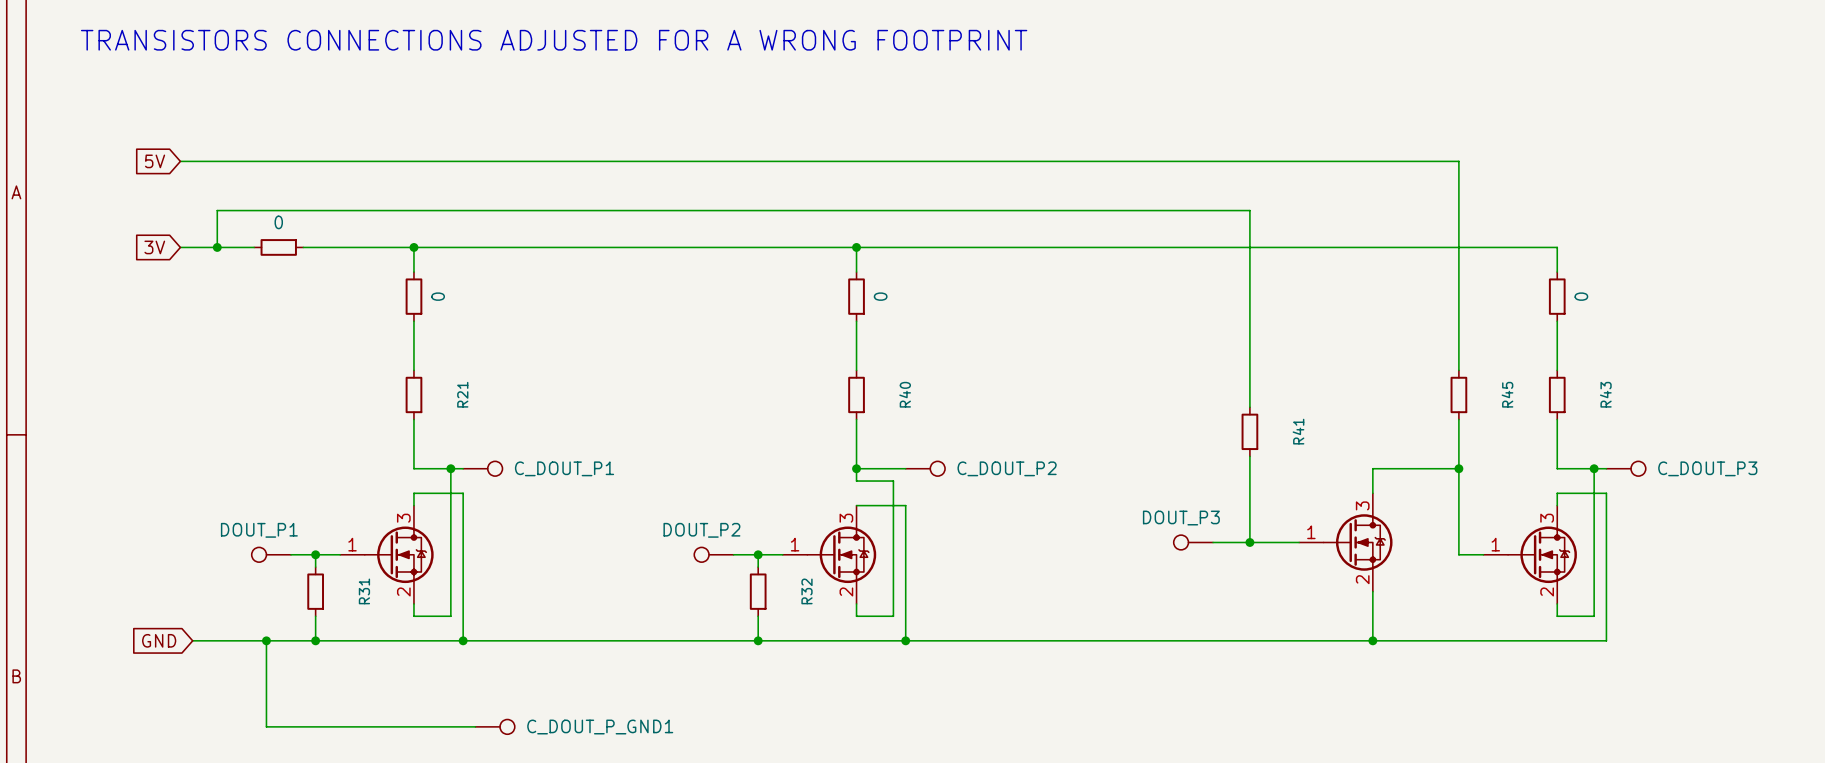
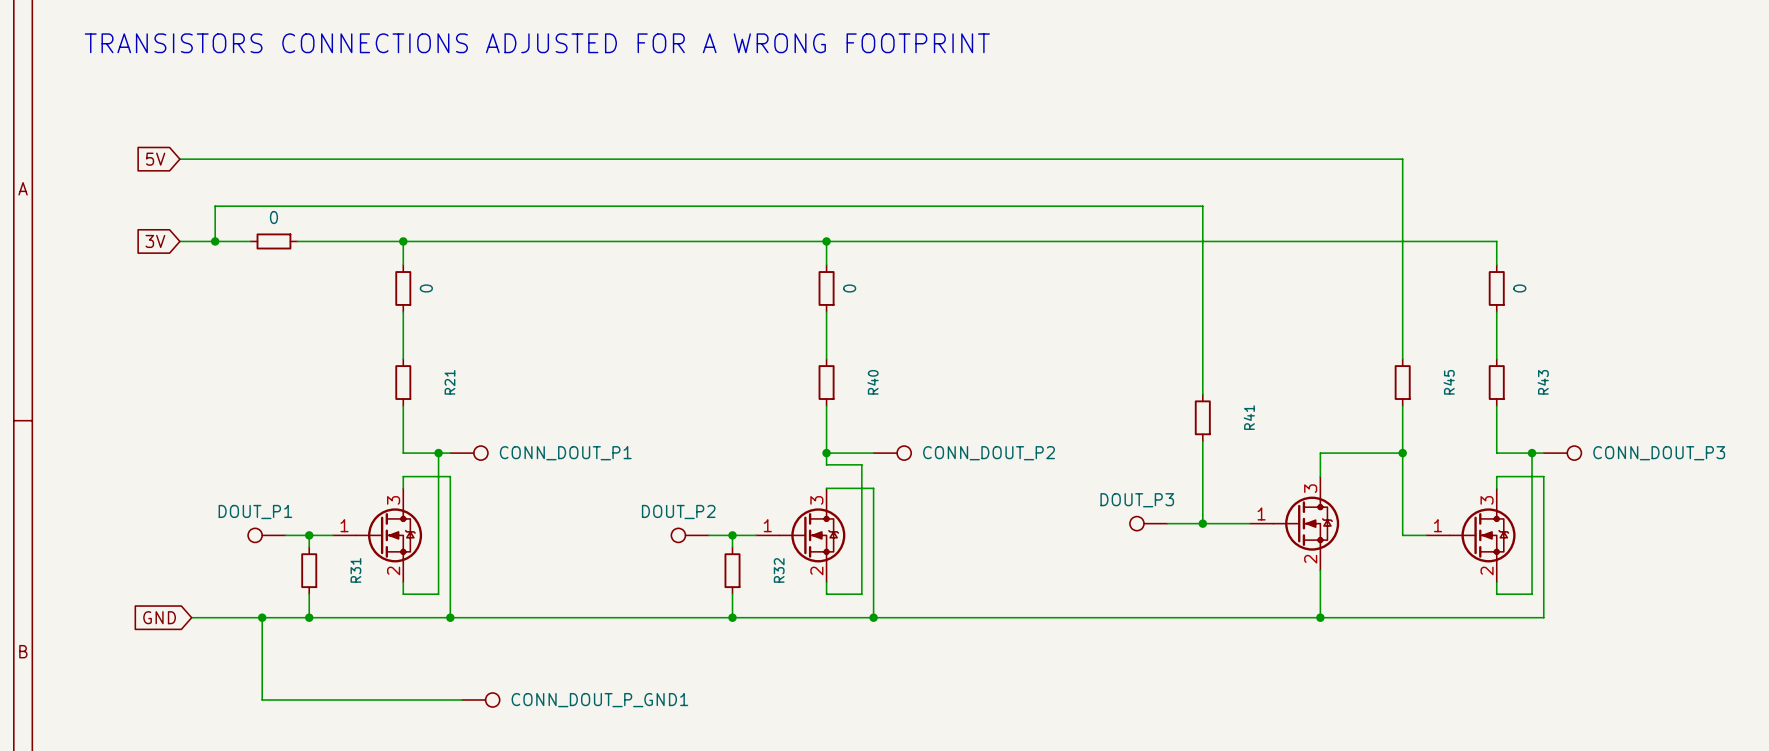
C_DOUT_P1 name: C_DOUT_P1 (564, 468) -> CONN_DOUT_P1 (565, 453)
C_DOUT_P2 name: C_DOUT_P2 (1007, 468) -> CONN_DOUT_P2 (989, 453)
C_DOUT_P3 name: C_DOUT_P3 (1707, 468) -> CONN_DOUT_P3 (1659, 453)
C_DOUT_P_GND1 name: C_DOUT_P_GND1 (600, 727) -> CONN_DOUT_P_GND1 (599, 700)

